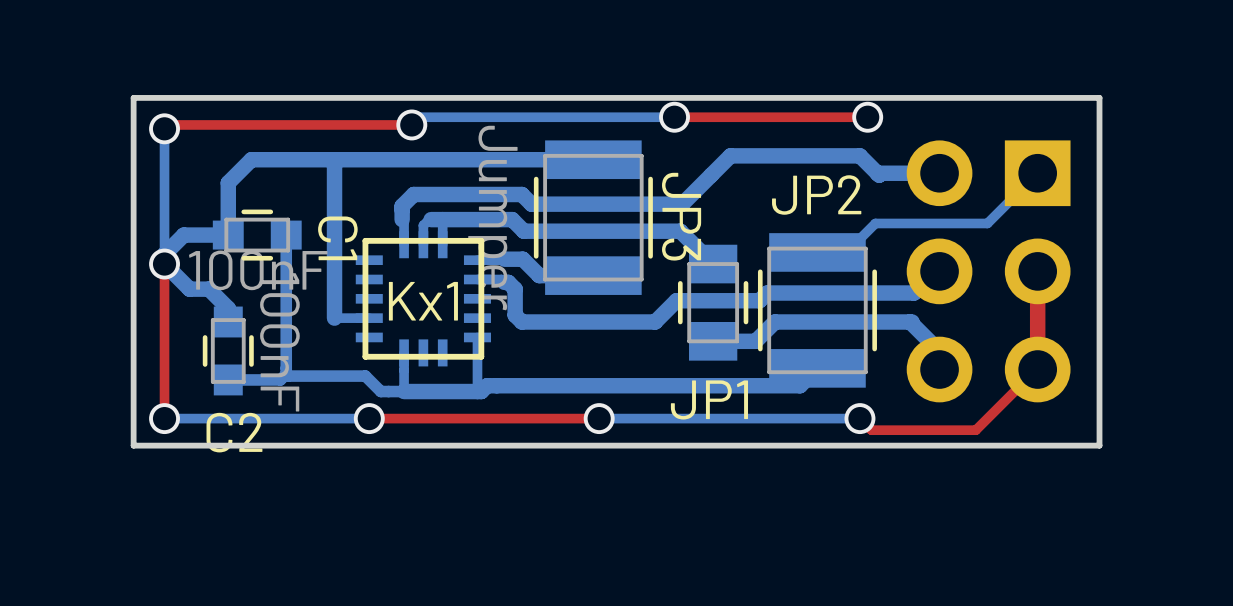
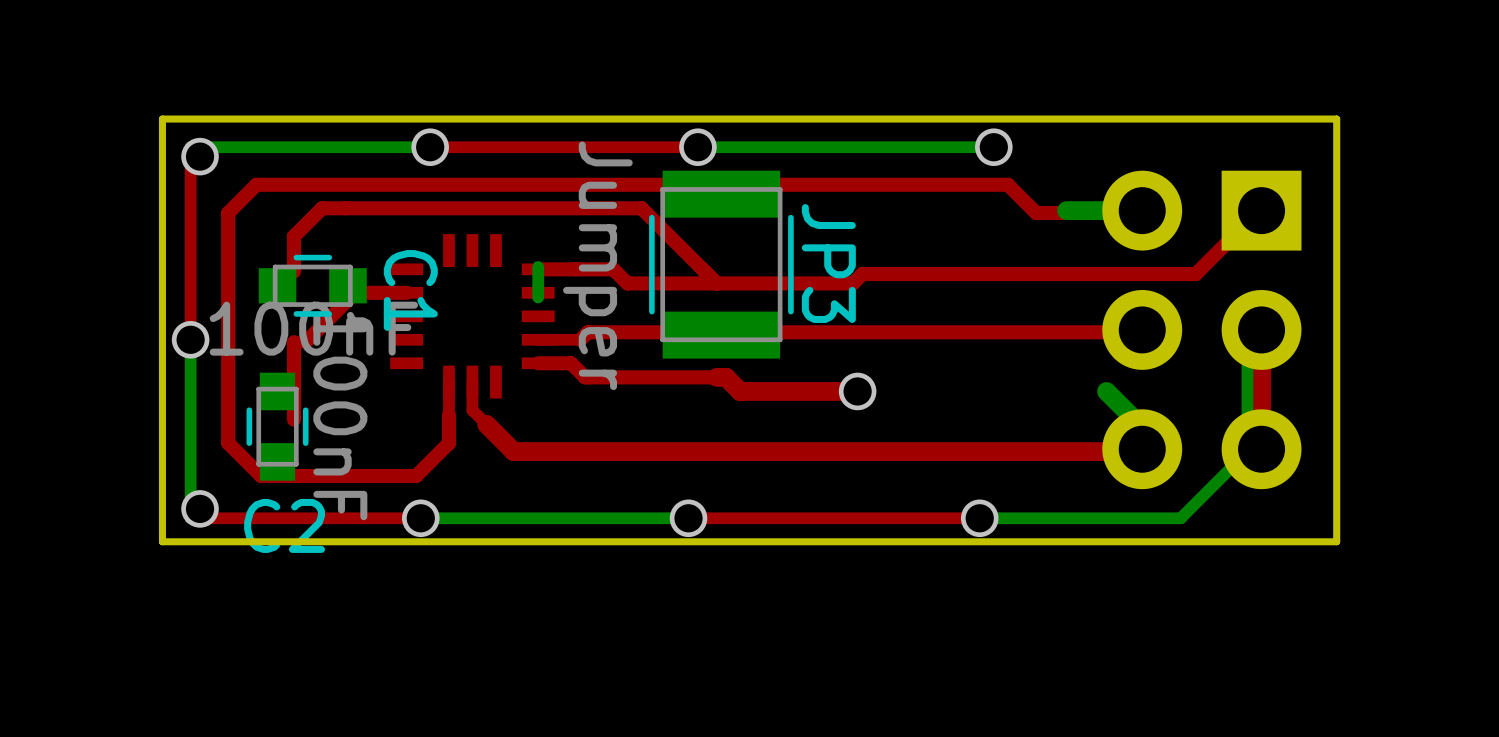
bottom track: (674, 117) (419, 117) (411, 124) -> none
via: (674, 117) -> none
top track: (867, 117) (674, 117) -> none
via position: (867, 117) -> (993, 147)
top track: none -> (190, 147) (190, 339)
bottom track: none -> (430, 147) (190, 147)
via: none -> (697, 147)
top track: none -> (707, 147) (430, 147)
bottom track: none -> (993, 147) (697, 147)
top track: (411, 124) (168, 124) (164, 128) -> none
via position: (411, 124) -> (430, 147)
bottom track: (164, 128) (164, 264) -> none
bottom track: (334, 159) (334, 318) (369, 318) -> none
bottom track: (593, 159) (251, 159) (228, 182) (228, 235) (183, 235) (164, 254) (164, 264) -> none
bottom track: (1037, 173) (987, 223) (875, 223) (846, 252) (817, 252) -> none
bottom track: (879, 175) (859, 155) (730, 155) (682, 204) (531, 204) (521, 194) (413, 194) (402, 206) (404, 244) -> none
top track: none -> (1128, 212) (1036, 212) (1007, 184) (256, 184) (228, 212) (228, 443) (261, 476) (416, 476) (448, 443) (448, 382)
top track: none -> (1247, 212) (1247, 222) (1195, 274) (862, 274) (852, 283) (627, 283) (613, 269) (538, 269)
top track: none -> (293, 271) (293, 236) (322, 208) (641, 208) (716, 283)
bottom track: (280, 240) (286, 235) (286, 374) -> none
top track: none -> (406, 292) (355, 292) (305, 342) (293, 342) (293, 419)
bottom track: (423, 244) (423, 225) (429, 219) (512, 219) (523, 231) (680, 231) (713, 264) -> none
bottom track: (477, 260) (522, 259) (539, 275) (593, 275) -> none
top track: (164, 264) (164, 418) -> none
bottom track: (164, 264) (189, 289) (208, 289) (228, 308) (228, 322) -> none
via position: (164, 264) -> (190, 339)
bottom track: (939, 271) (935, 271) (914, 293) (767, 293) (759, 300) (676, 300) (655, 322) (521, 322) (515, 315) (515, 289) (508, 282) (504, 282) (501, 279) (477, 279) -> none
top track: none -> (1128, 332) (588, 332) (580, 339) (538, 339)
bottom track: none -> (1247, 332) (1247, 451) (1180, 518) (979, 518)
bottom track: none -> (190, 339) (190, 518)
Kx1 side: bottom (423, 298) -> top (472, 316)
top track: none -> (538, 363) (571, 363) (585, 377) (726, 377) (740, 391) (857, 391)
JP1: (713, 302) -> none
JP2: (817, 310) -> none
top track: none -> (472, 382) (472, 410) (513, 451) (1128, 451)
via: none -> (857, 391)
bottom track: (912, 322) (774, 322) (755, 341) (713, 341) -> none
bottom track: (477, 337) (477, 391) -> none
bottom track: (404, 352) (404, 391) -> none
bottom track: (817, 368) (800, 385) (487, 385) (481, 391) (404, 391) -> none
top track: (1034, 369) (1037, 369) (975, 430) (871, 430) (859, 418) -> none
bottom track: (286, 374) (288, 376) (365, 376) (380, 391) (404, 391) -> none
bottom track: (286, 374) (280, 379) (228, 379) (234, 385) -> none
bottom track: (369, 418) (164, 418) -> none
via position: (369, 418) -> (420, 518)
top track: (599, 418) (369, 418) -> none
via position: (599, 418) -> (688, 518)
bottom track: (859, 418) (599, 418) -> none
via position: (859, 418) -> (979, 518)
top track: none -> (420, 518) (190, 518)
bottom track: none -> (688, 518) (420, 518)
top track: none -> (979, 518) (688, 518)

